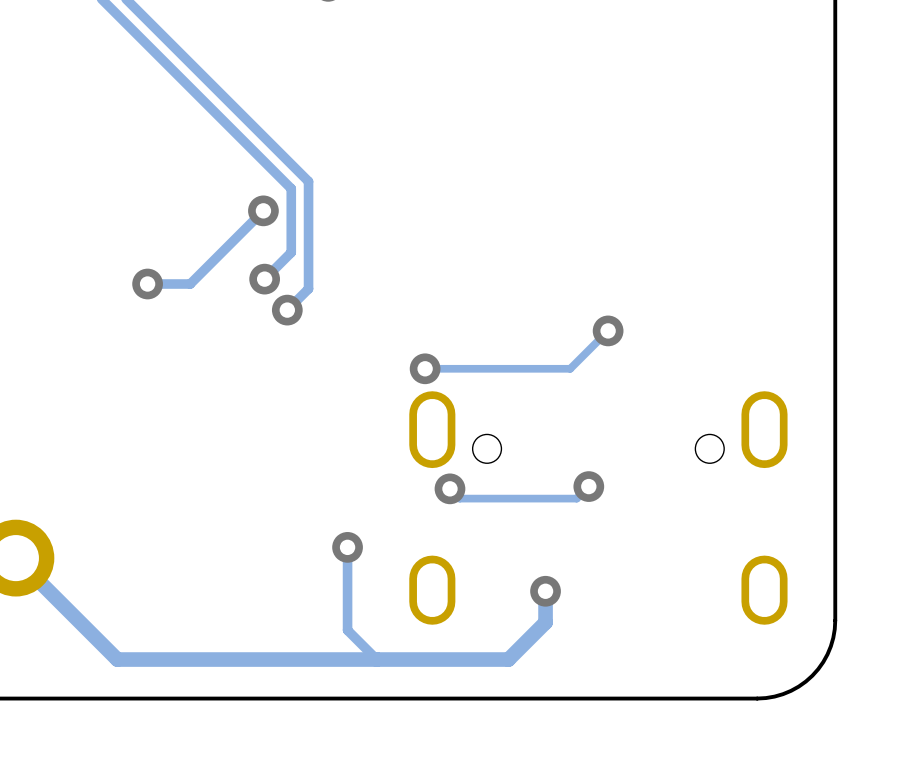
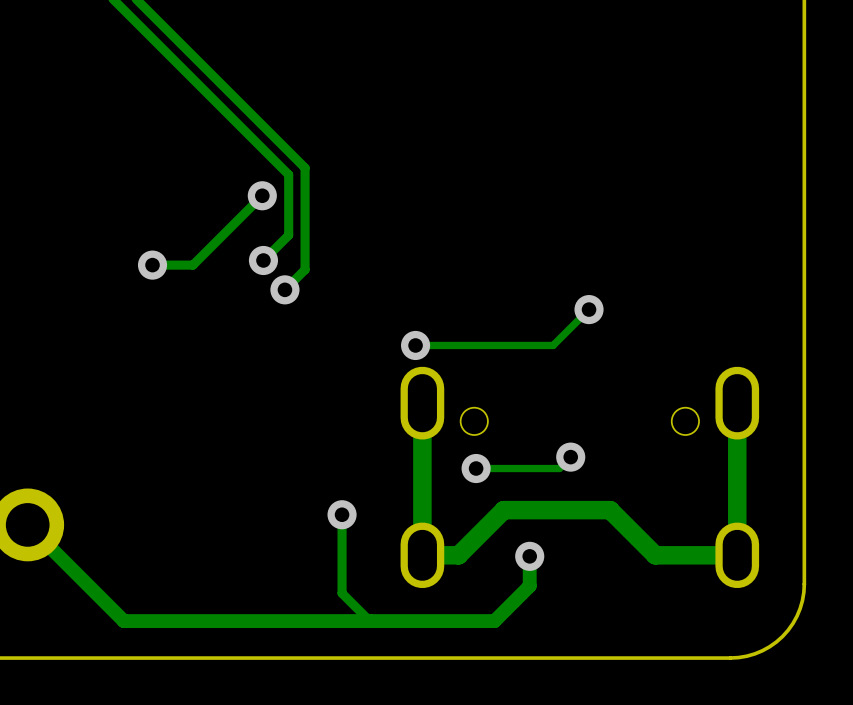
track: none -> (737, 403) (737, 555) (655, 555) (610, 510) (503, 510) (458, 555) (422, 555) (422, 403)
track: (449, 488) (459, 498) (488, 498) -> none
via position: (449, 488) -> (476, 468)

